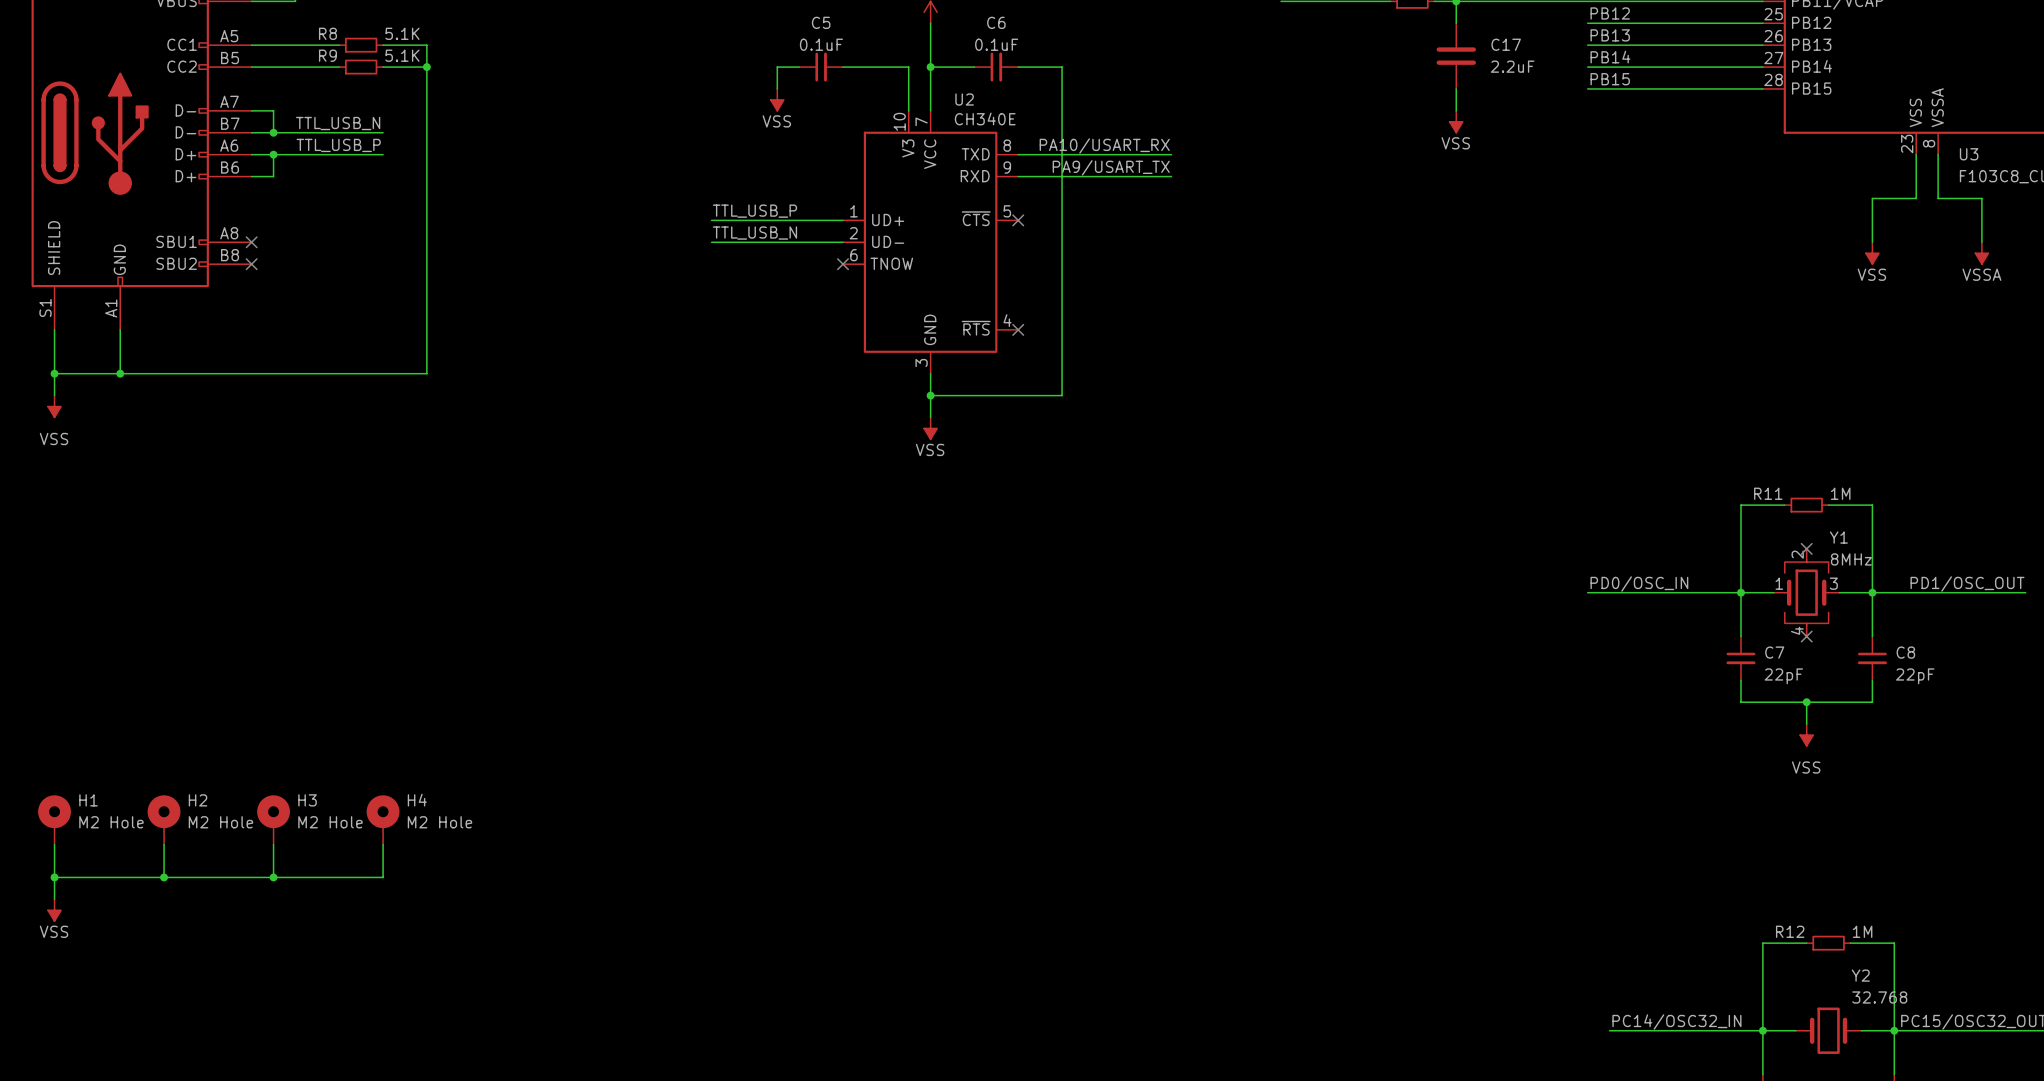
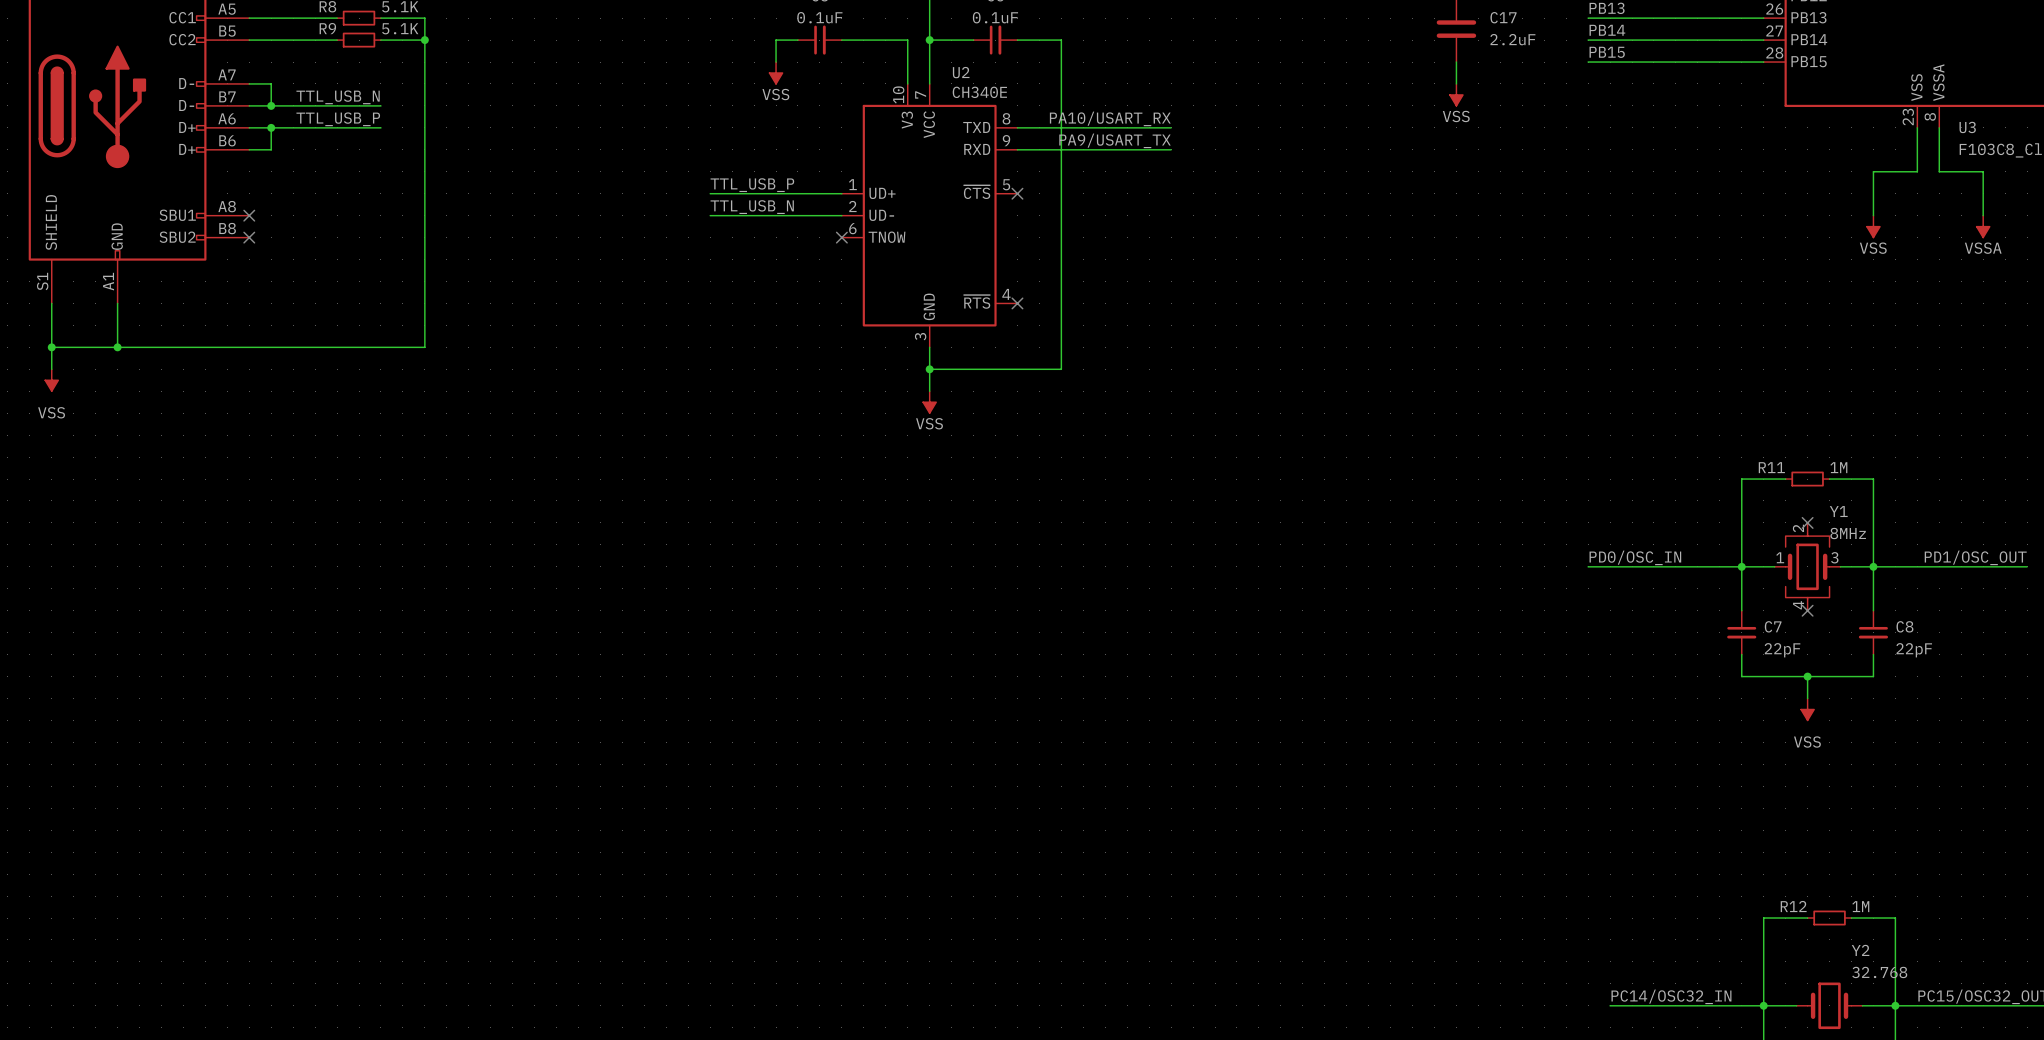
H1: M2 Hole (54, 819) -> none
H2: M2 Hole (164, 819) -> none
H3: M2 Hole (273, 819) -> none
H4: M2 Hole (383, 819) -> none
wire: (54, 844) (54, 899) -> none
wire: (164, 844) (164, 877) -> none
wire: (273, 844) (273, 877) -> none
wire: (383, 844) (383, 877) (54, 877) -> none
junction: (54, 877) -> none
junction: (164, 877) -> none
junction: (273, 877) -> none
power symbol: VSS (54, 910) -> none

